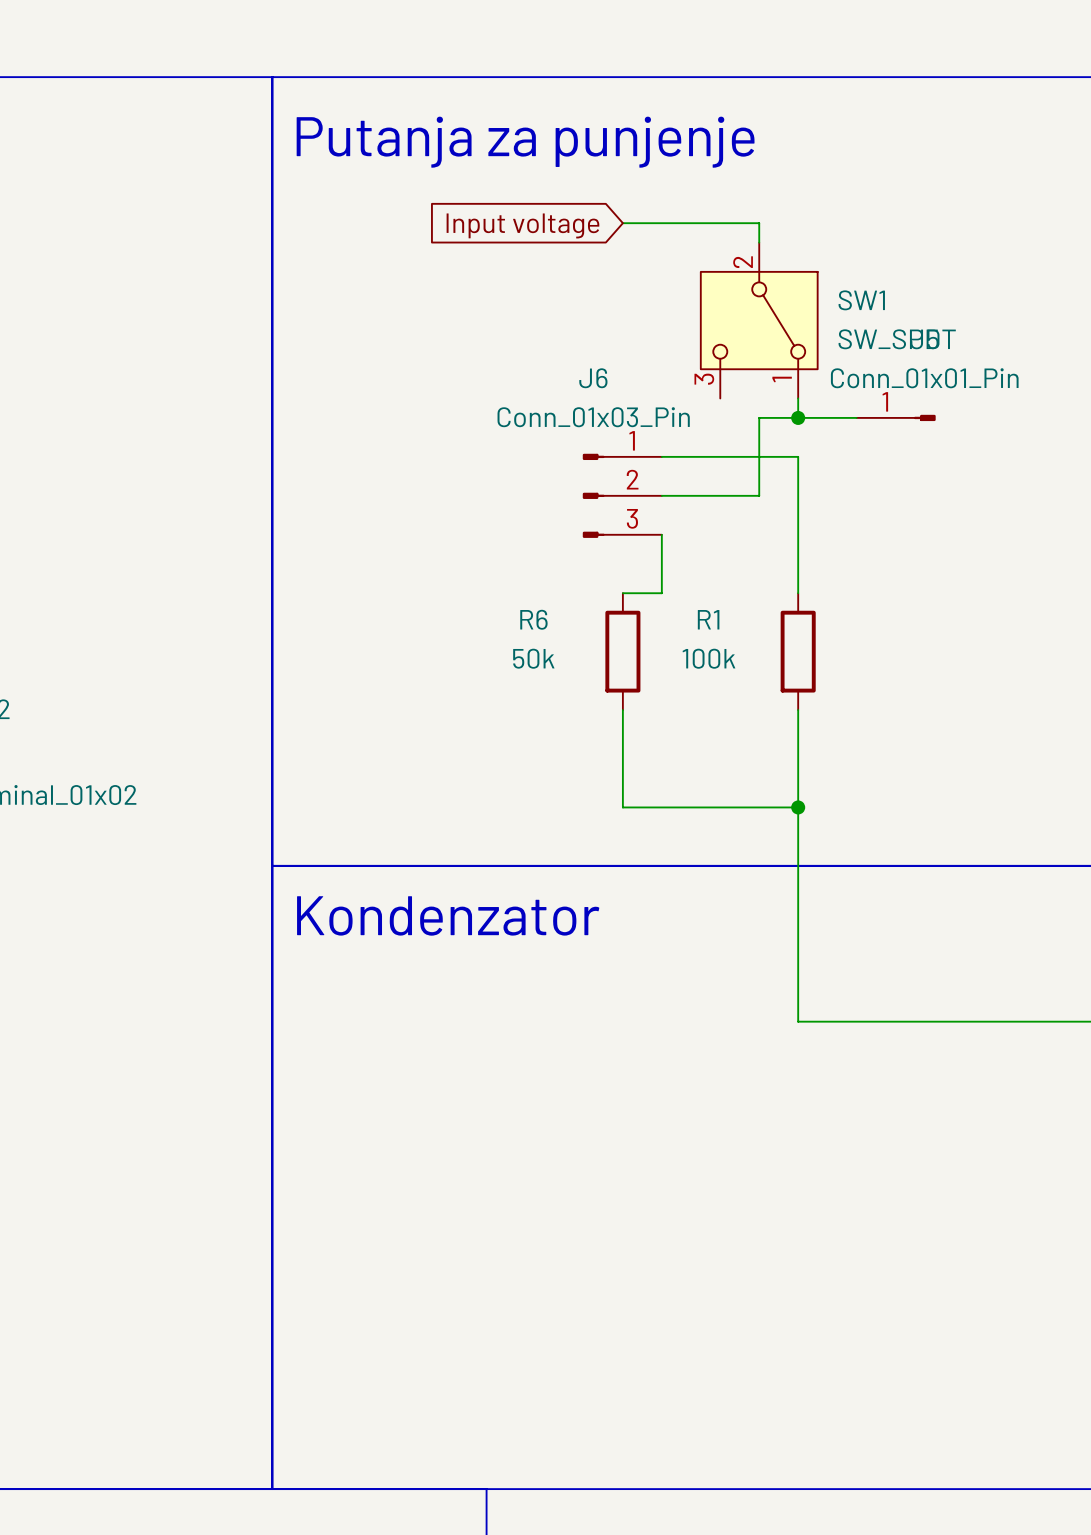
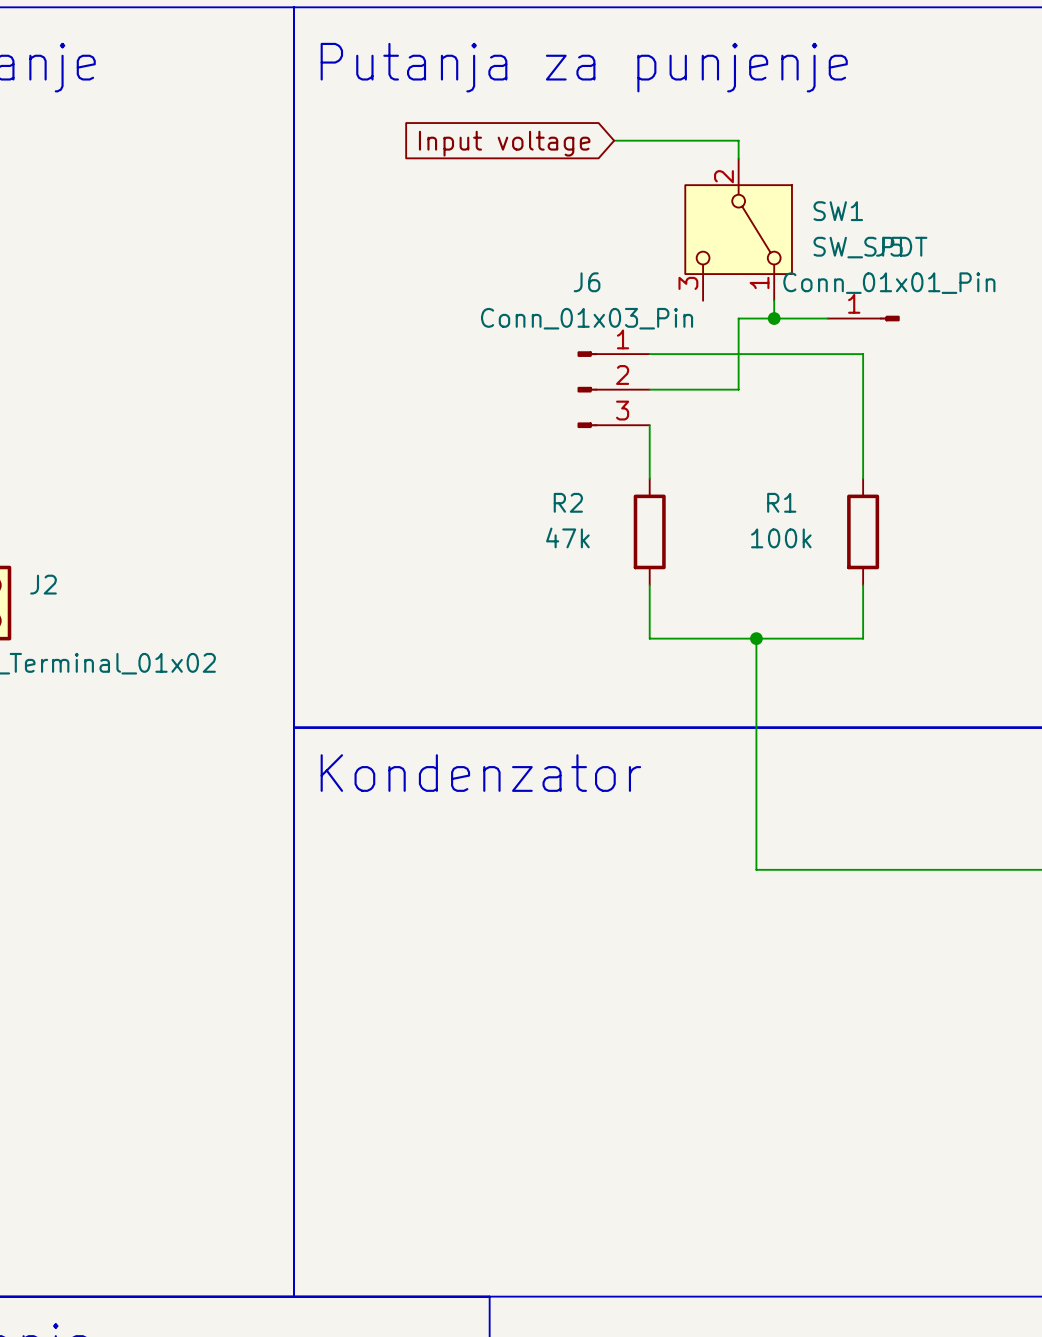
wire: (798, 456) (798, 593) -> (774, 354) (863, 354) (863, 478)
wire: (622, 593) (661, 593) -> none
R6: 50k (622, 651) -> none
R2: none -> 47k (649, 531)
R1 position: (798, 651) -> (863, 531)
wire: (622, 710) (622, 807) (798, 807) -> none
wire: none -> (649, 585) (649, 638) (863, 638) (863, 585)
wire: (798, 710) (798, 1021) -> (756, 638) (756, 869) (774, 869)
junction position: (798, 807) -> (756, 638)

